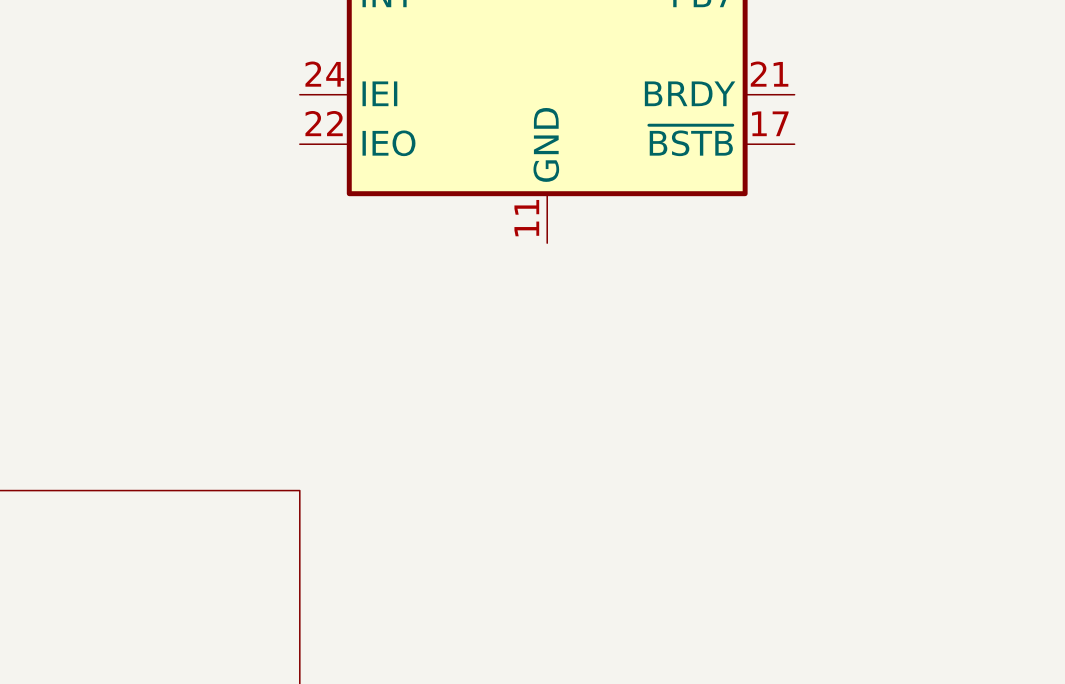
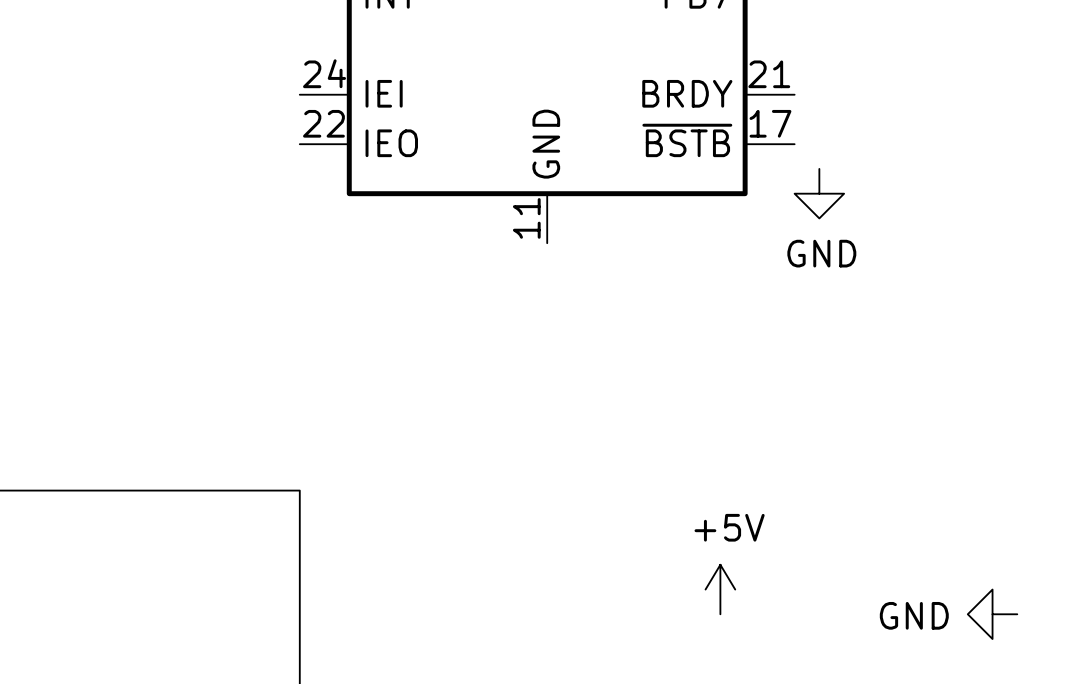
power symbol: none -> GND (819, 193)
power symbol: none -> +5V (720, 589)
power symbol: none -> GND (992, 614)

